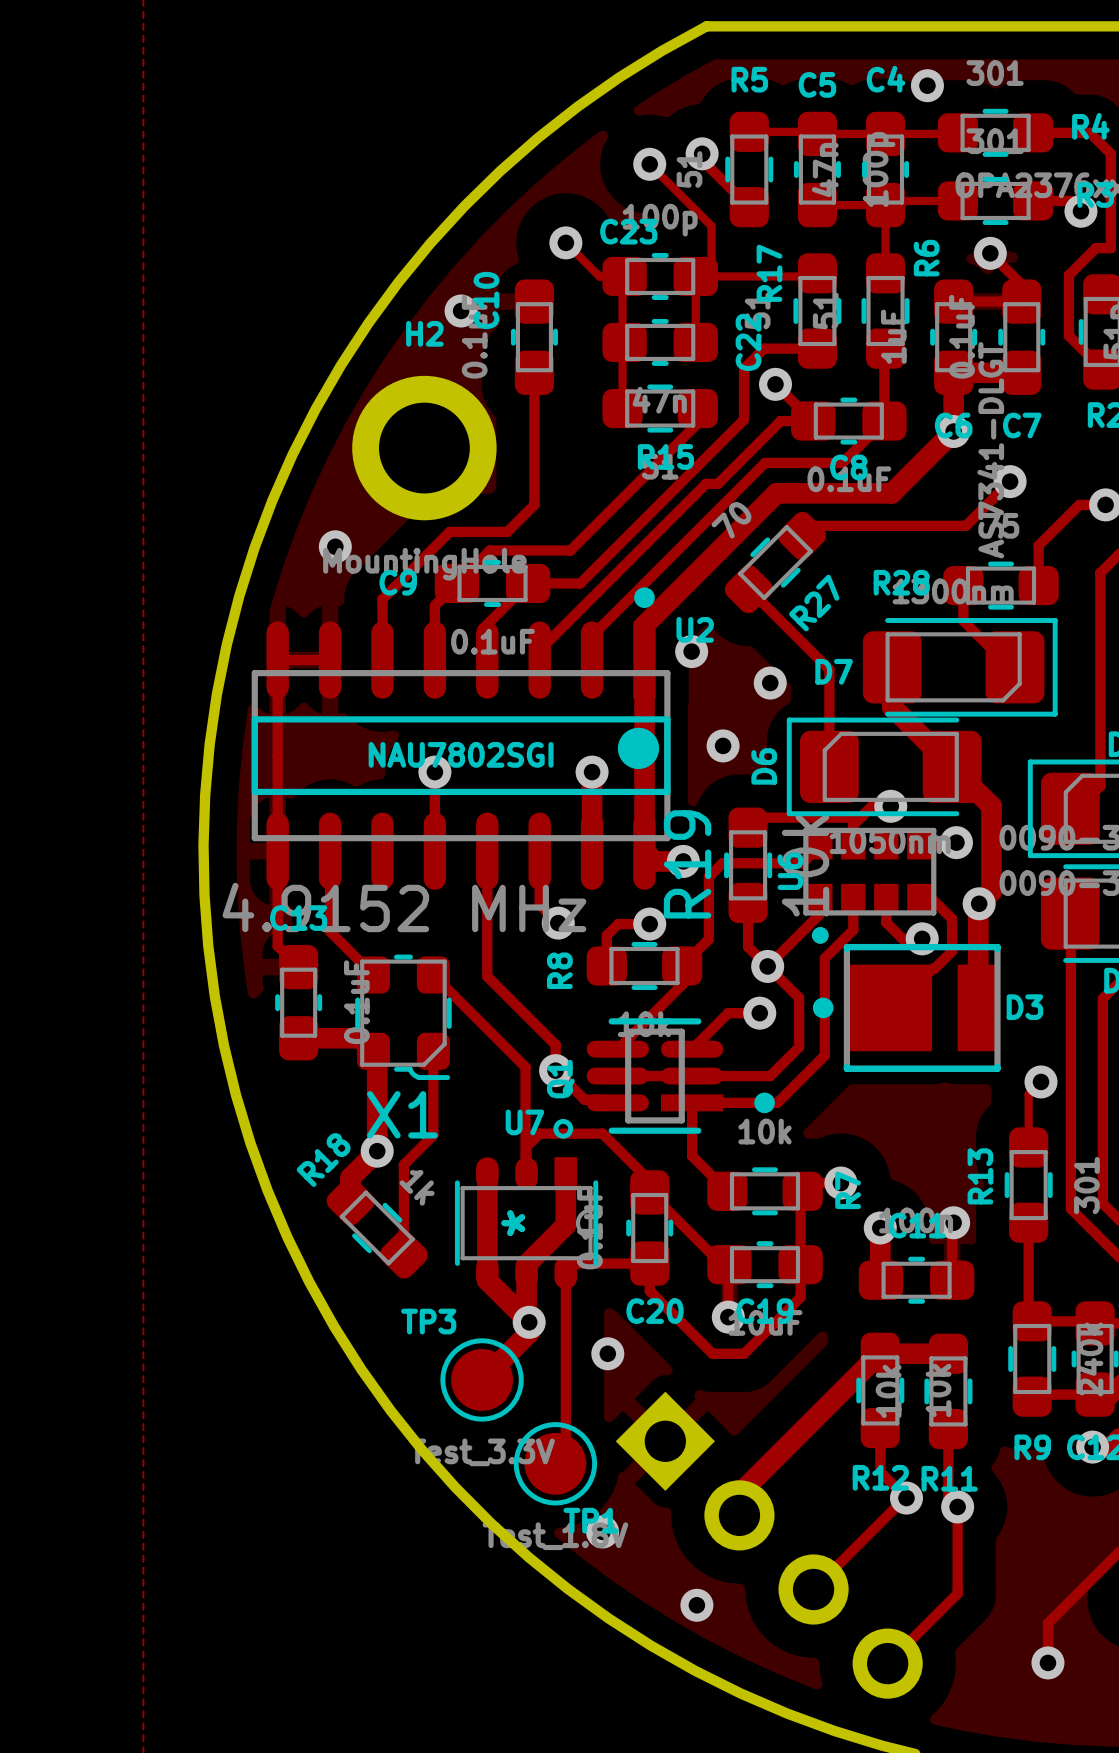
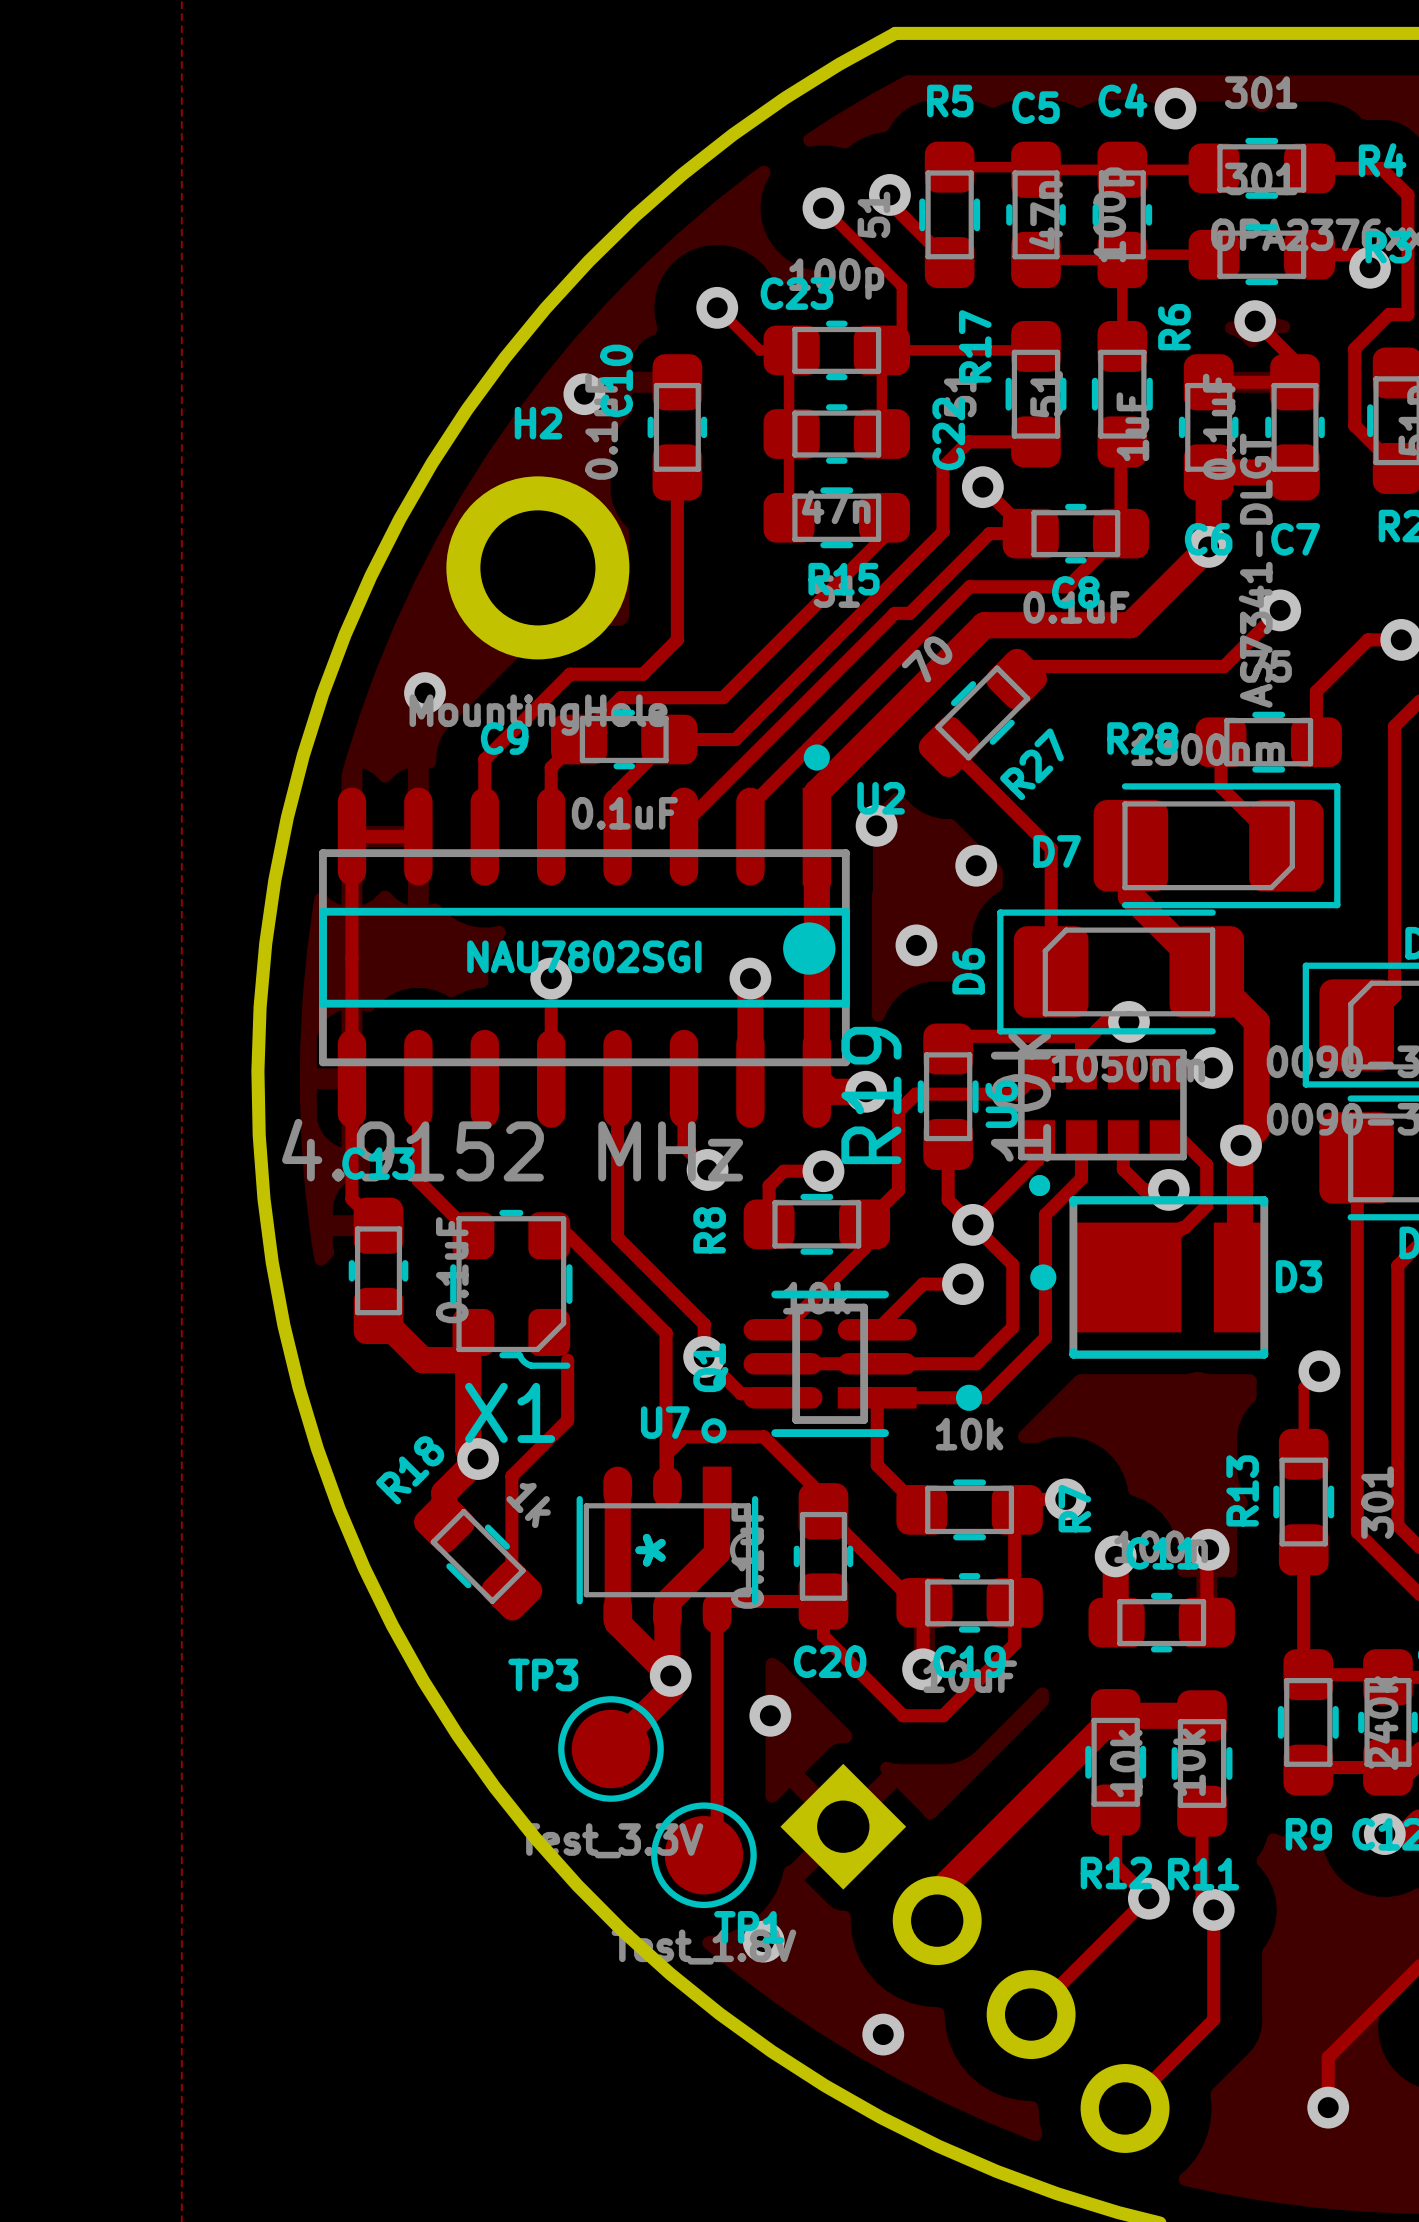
track: (433, 975) (525, 1067) -> (567, 1234) (666, 1333) (666, 1352)
track: (298, 1038) (360, 1038) (377, 1055) (377, 1151) -> (378, 1315) (422, 1360) (468, 1360) (468, 1449) (478, 1459)
track: (433, 1051) (433, 1135) -> (567, 1360) (567, 1420) (549, 1438)

